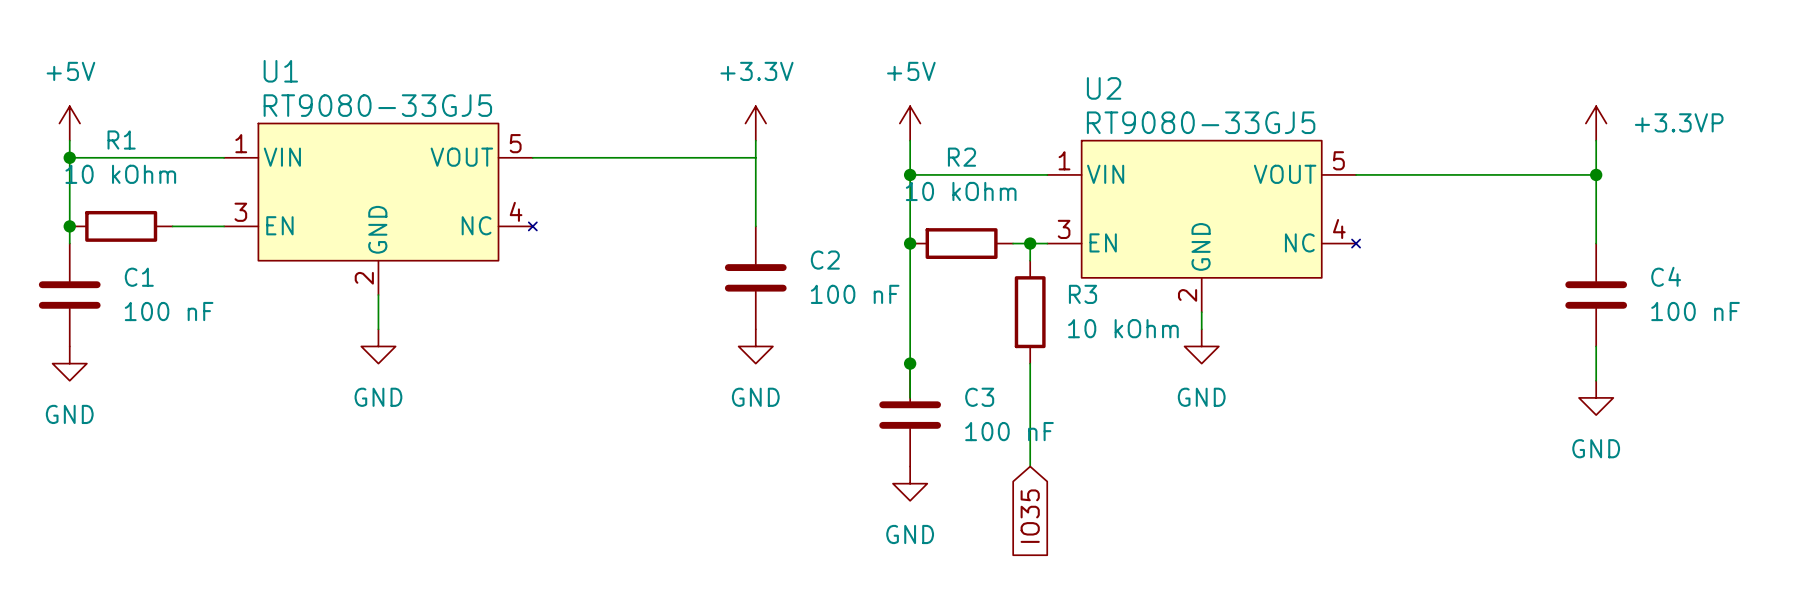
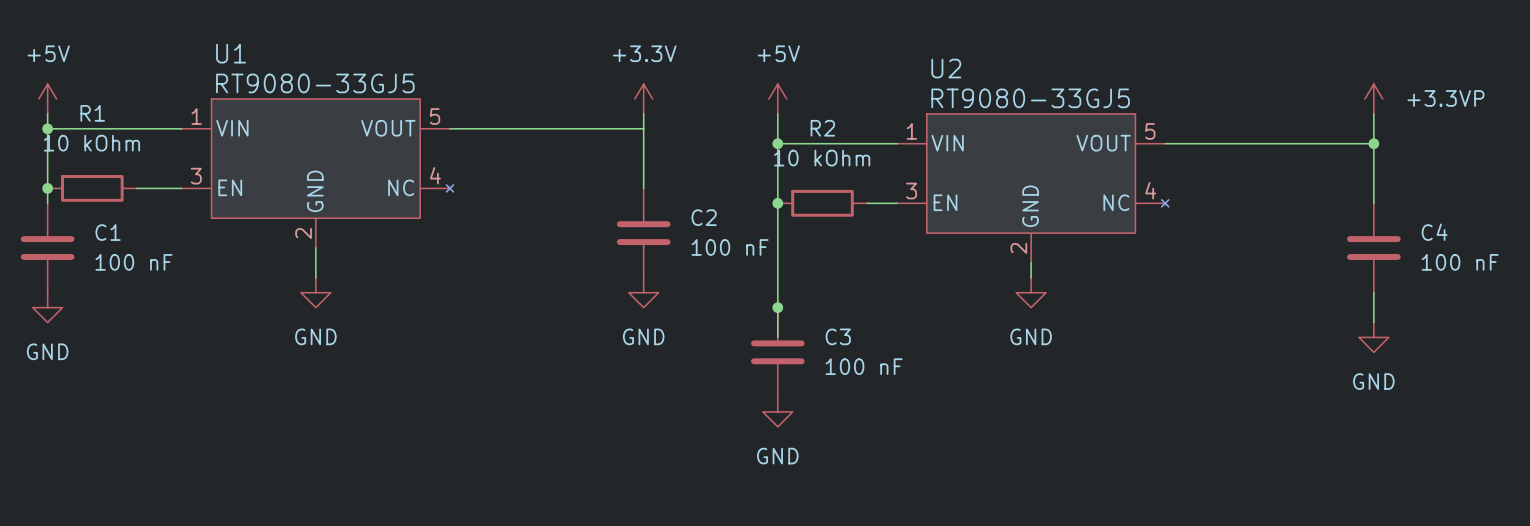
wire: (1030, 243) (1030, 260) -> none
junction: (1030, 243) -> none
R3: 10 kOhm (1030, 312) -> none
wire: (1030, 363) (1030, 466) -> none
global label: IO35 (1030, 516) -> none

